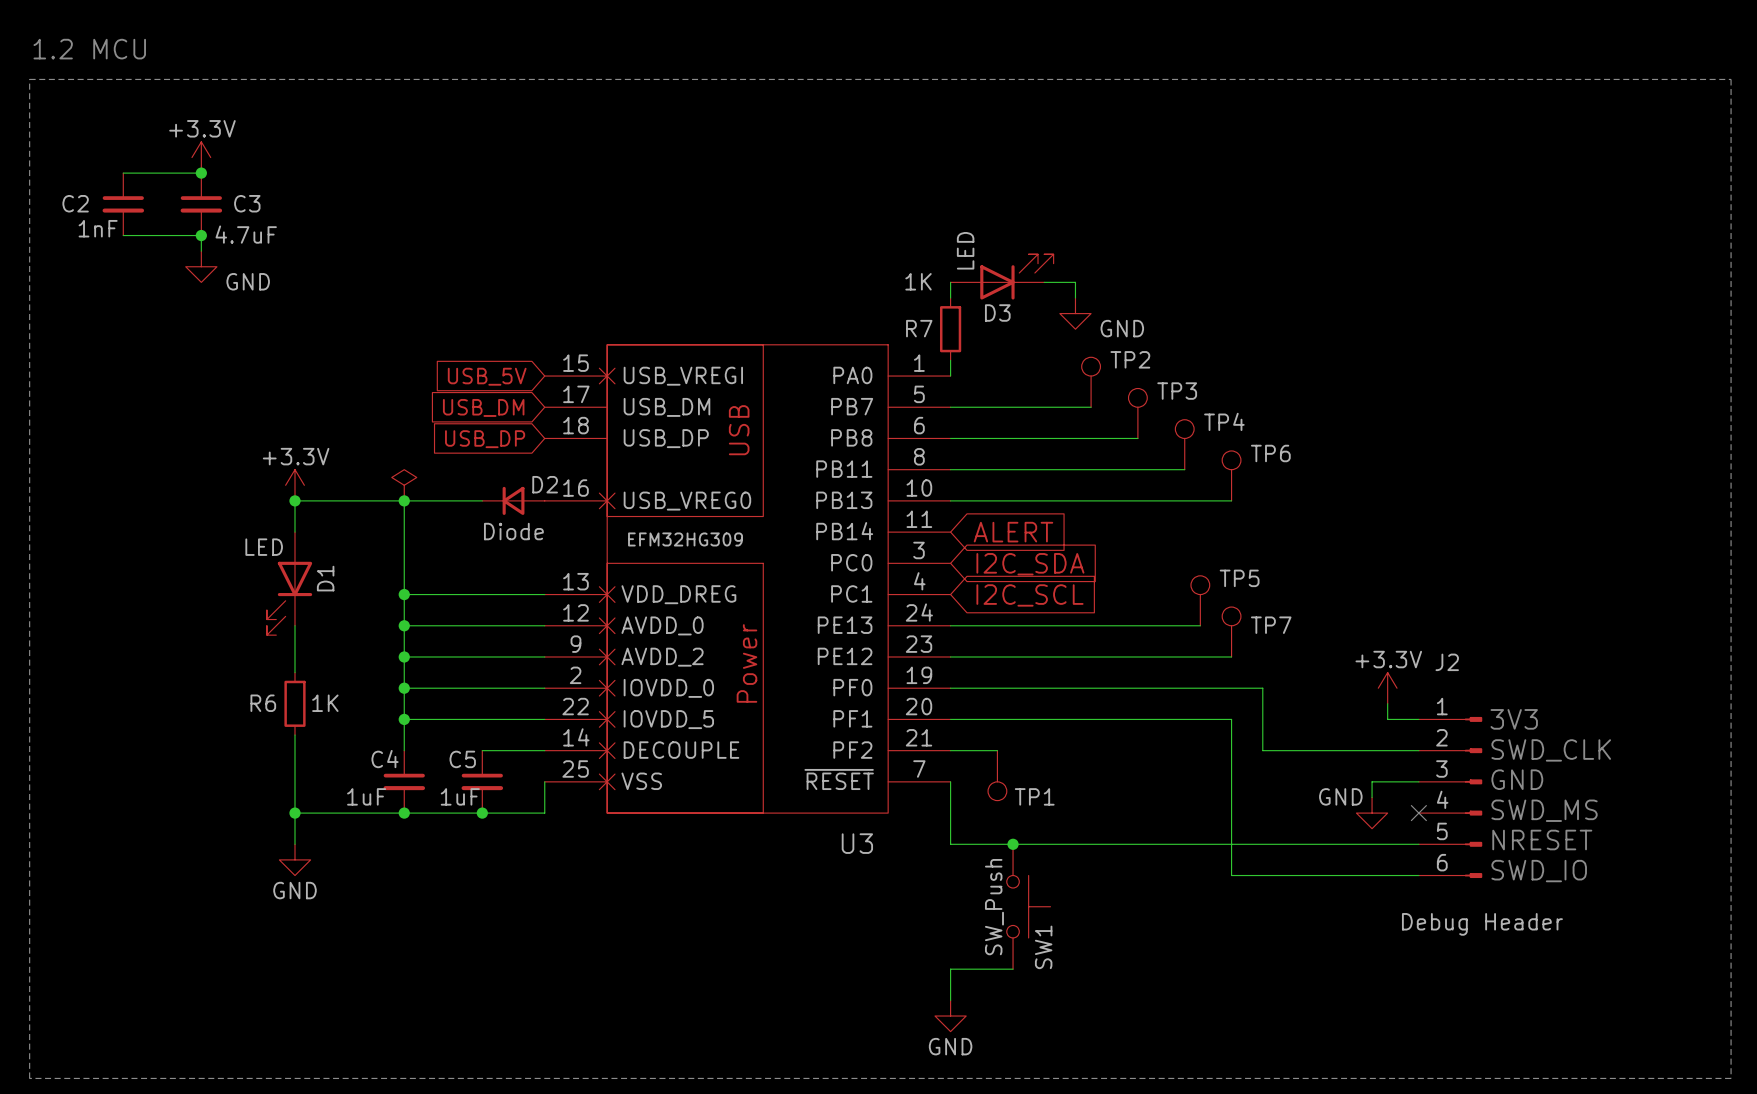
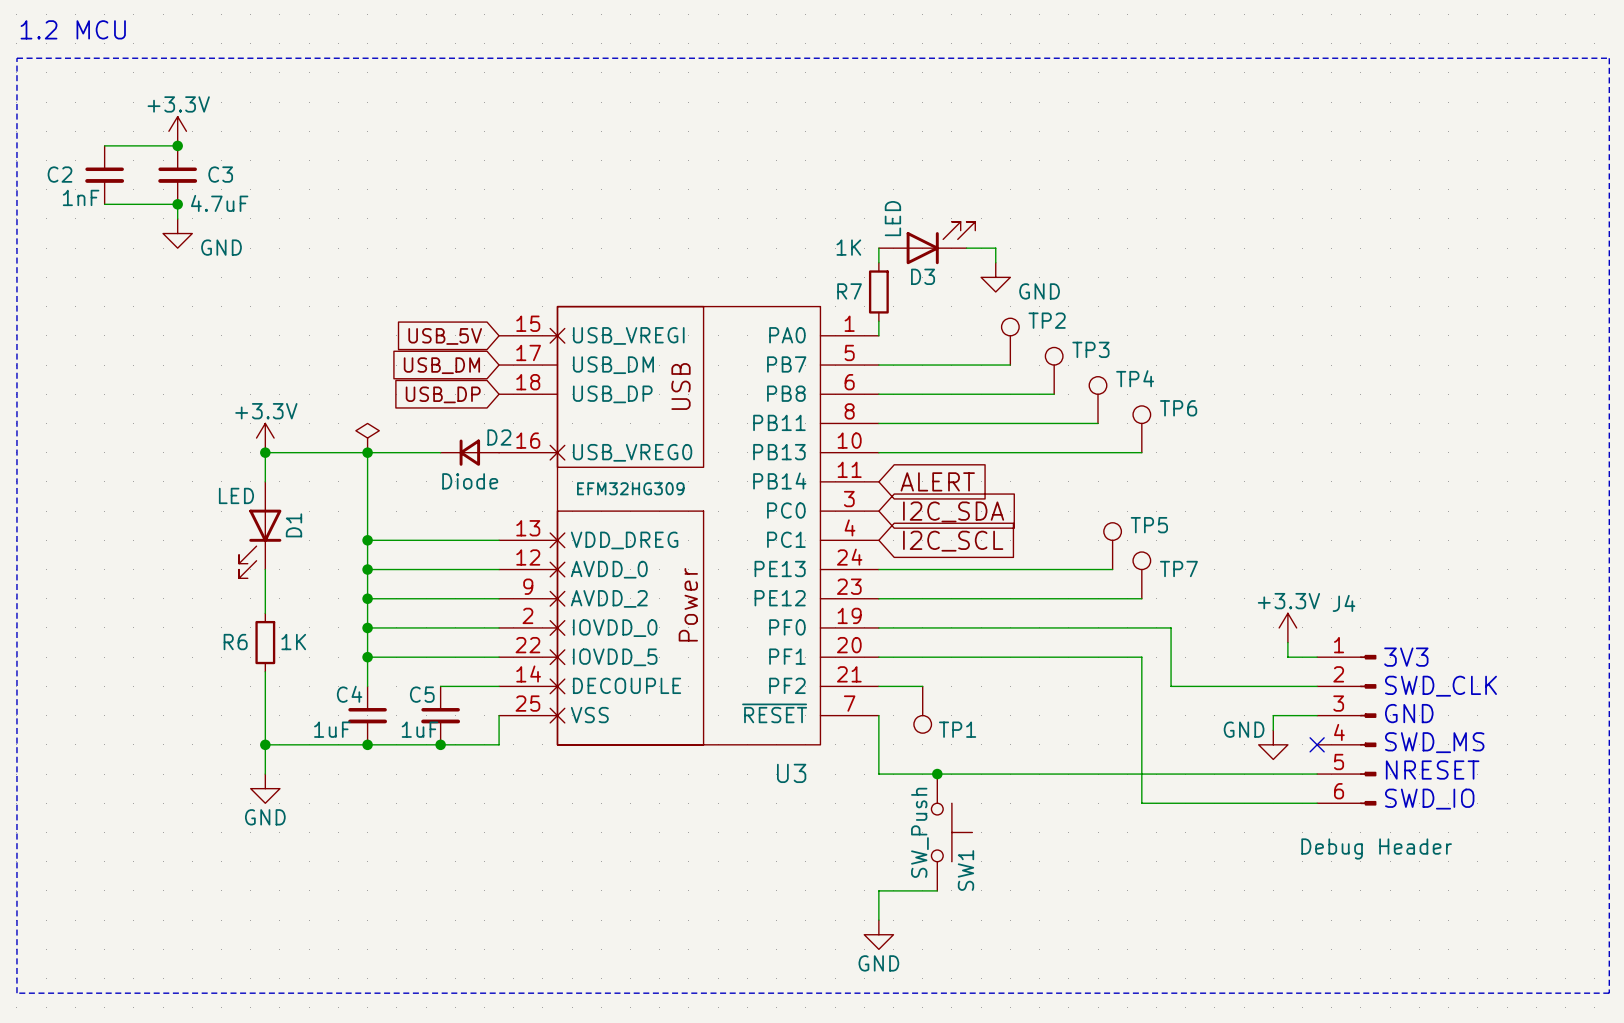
J2 name: J2 (1447, 662) -> J4 (1344, 603)

